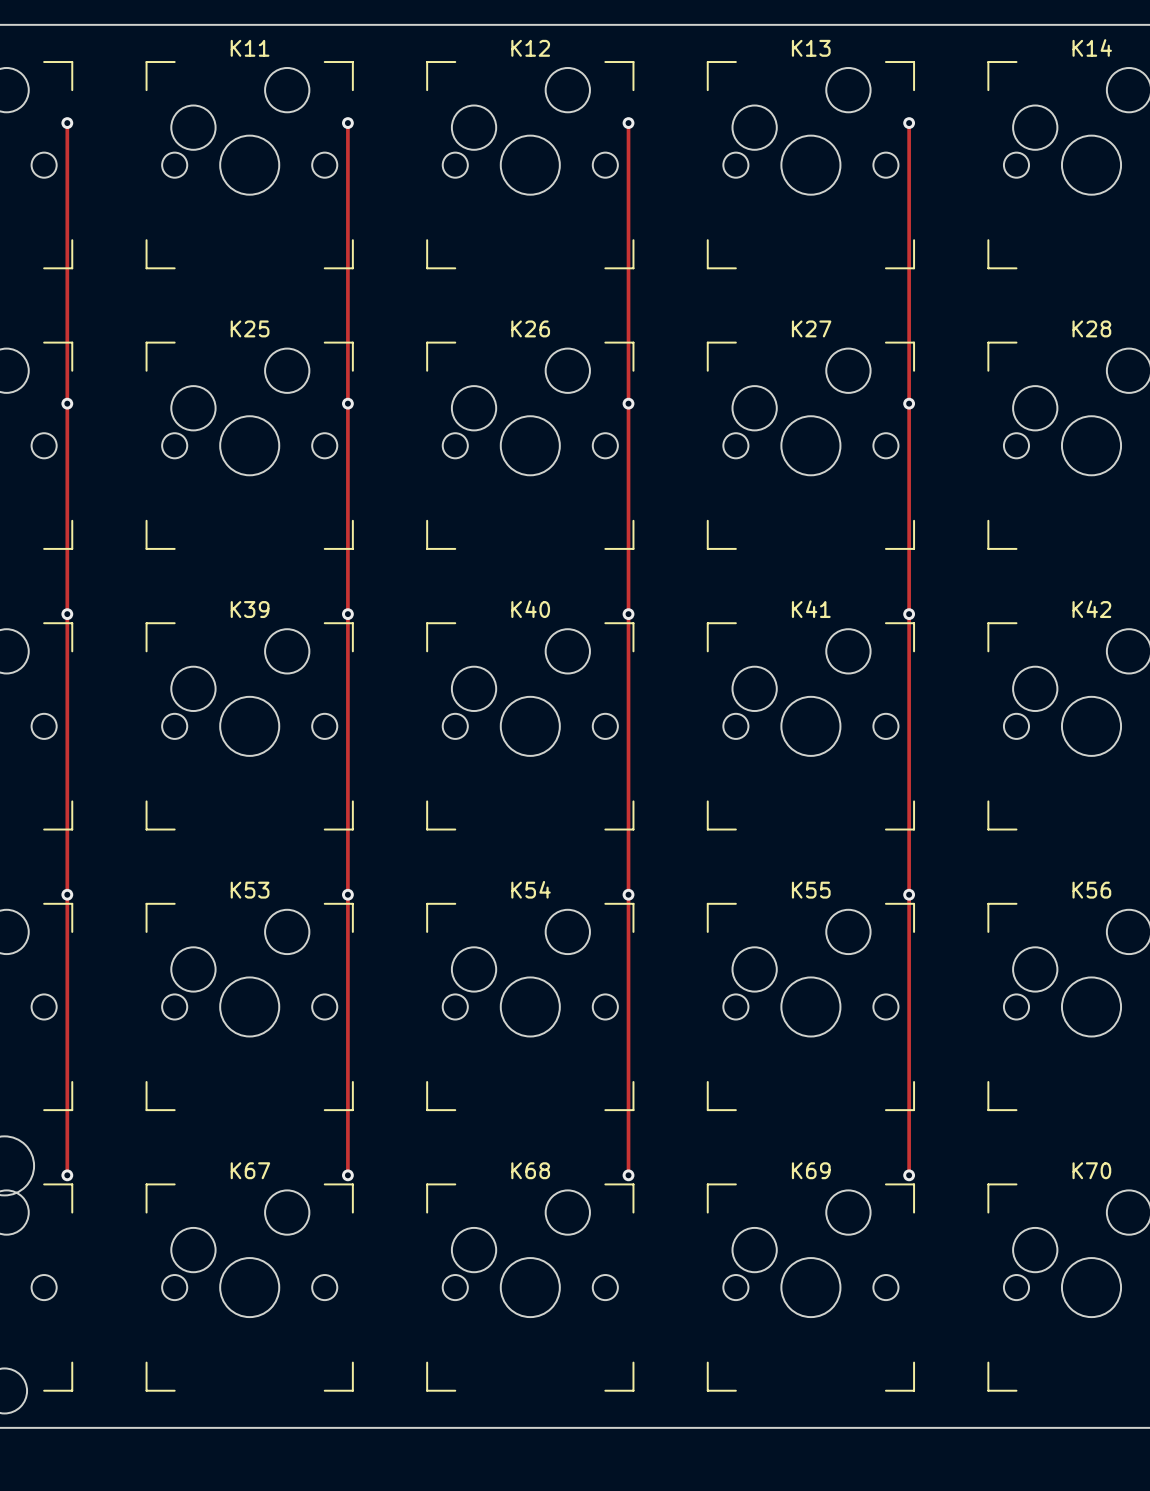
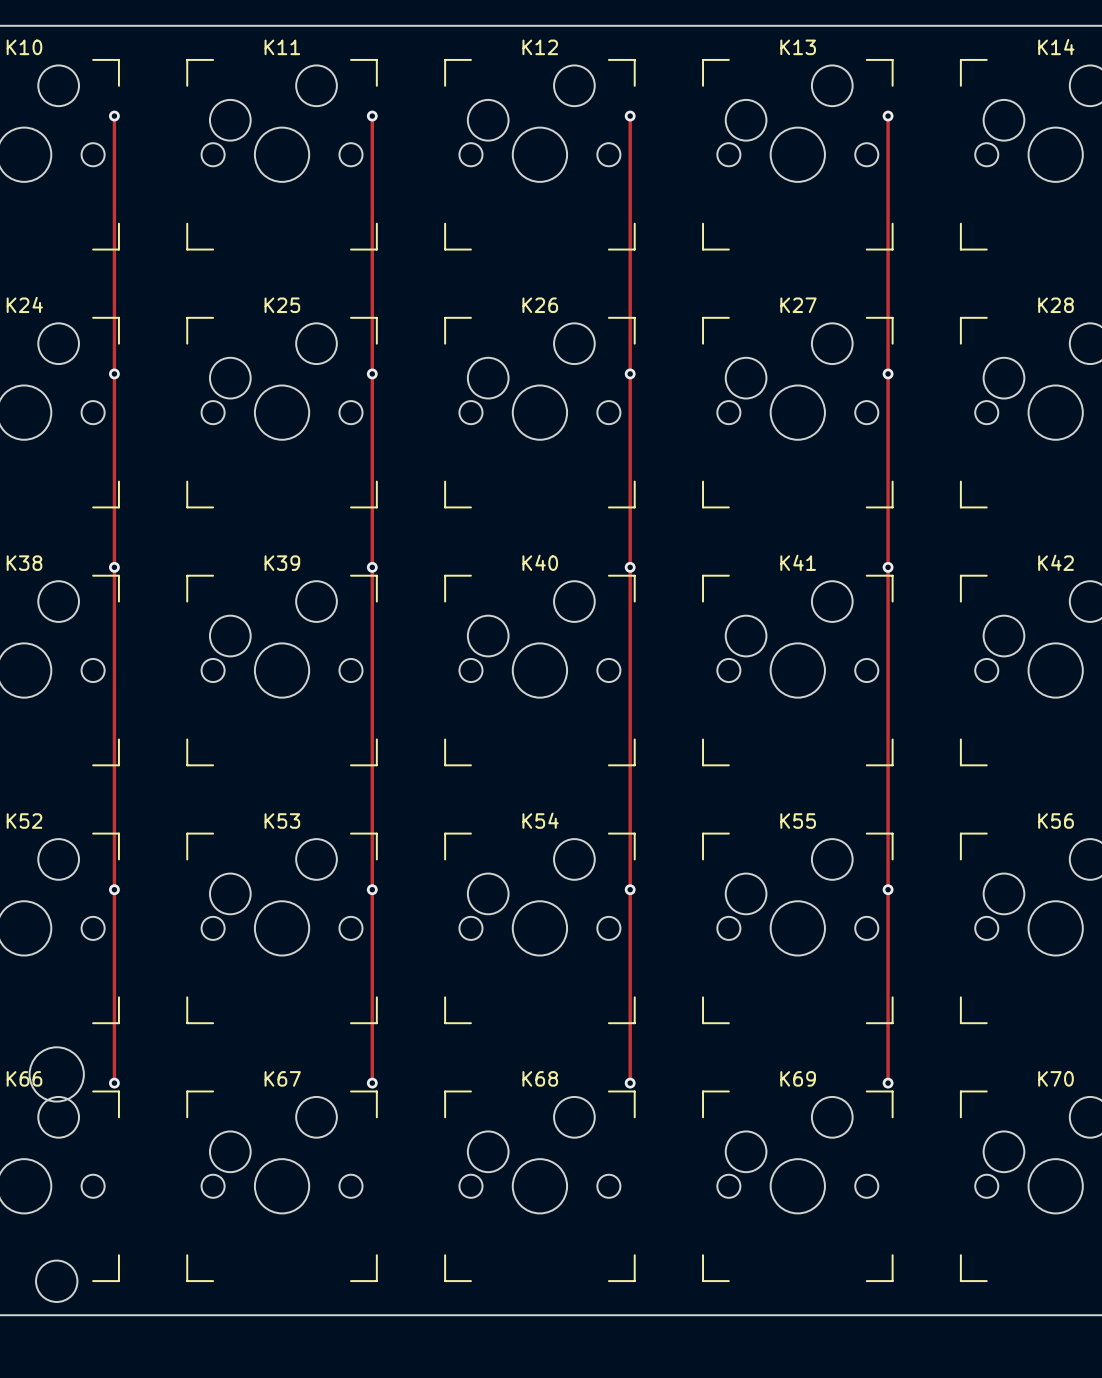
via position: (67, 894) -> (114, 889)
via position: (347, 894) -> (372, 889)
via position: (628, 894) -> (630, 889)
via position: (909, 894) -> (888, 889)

